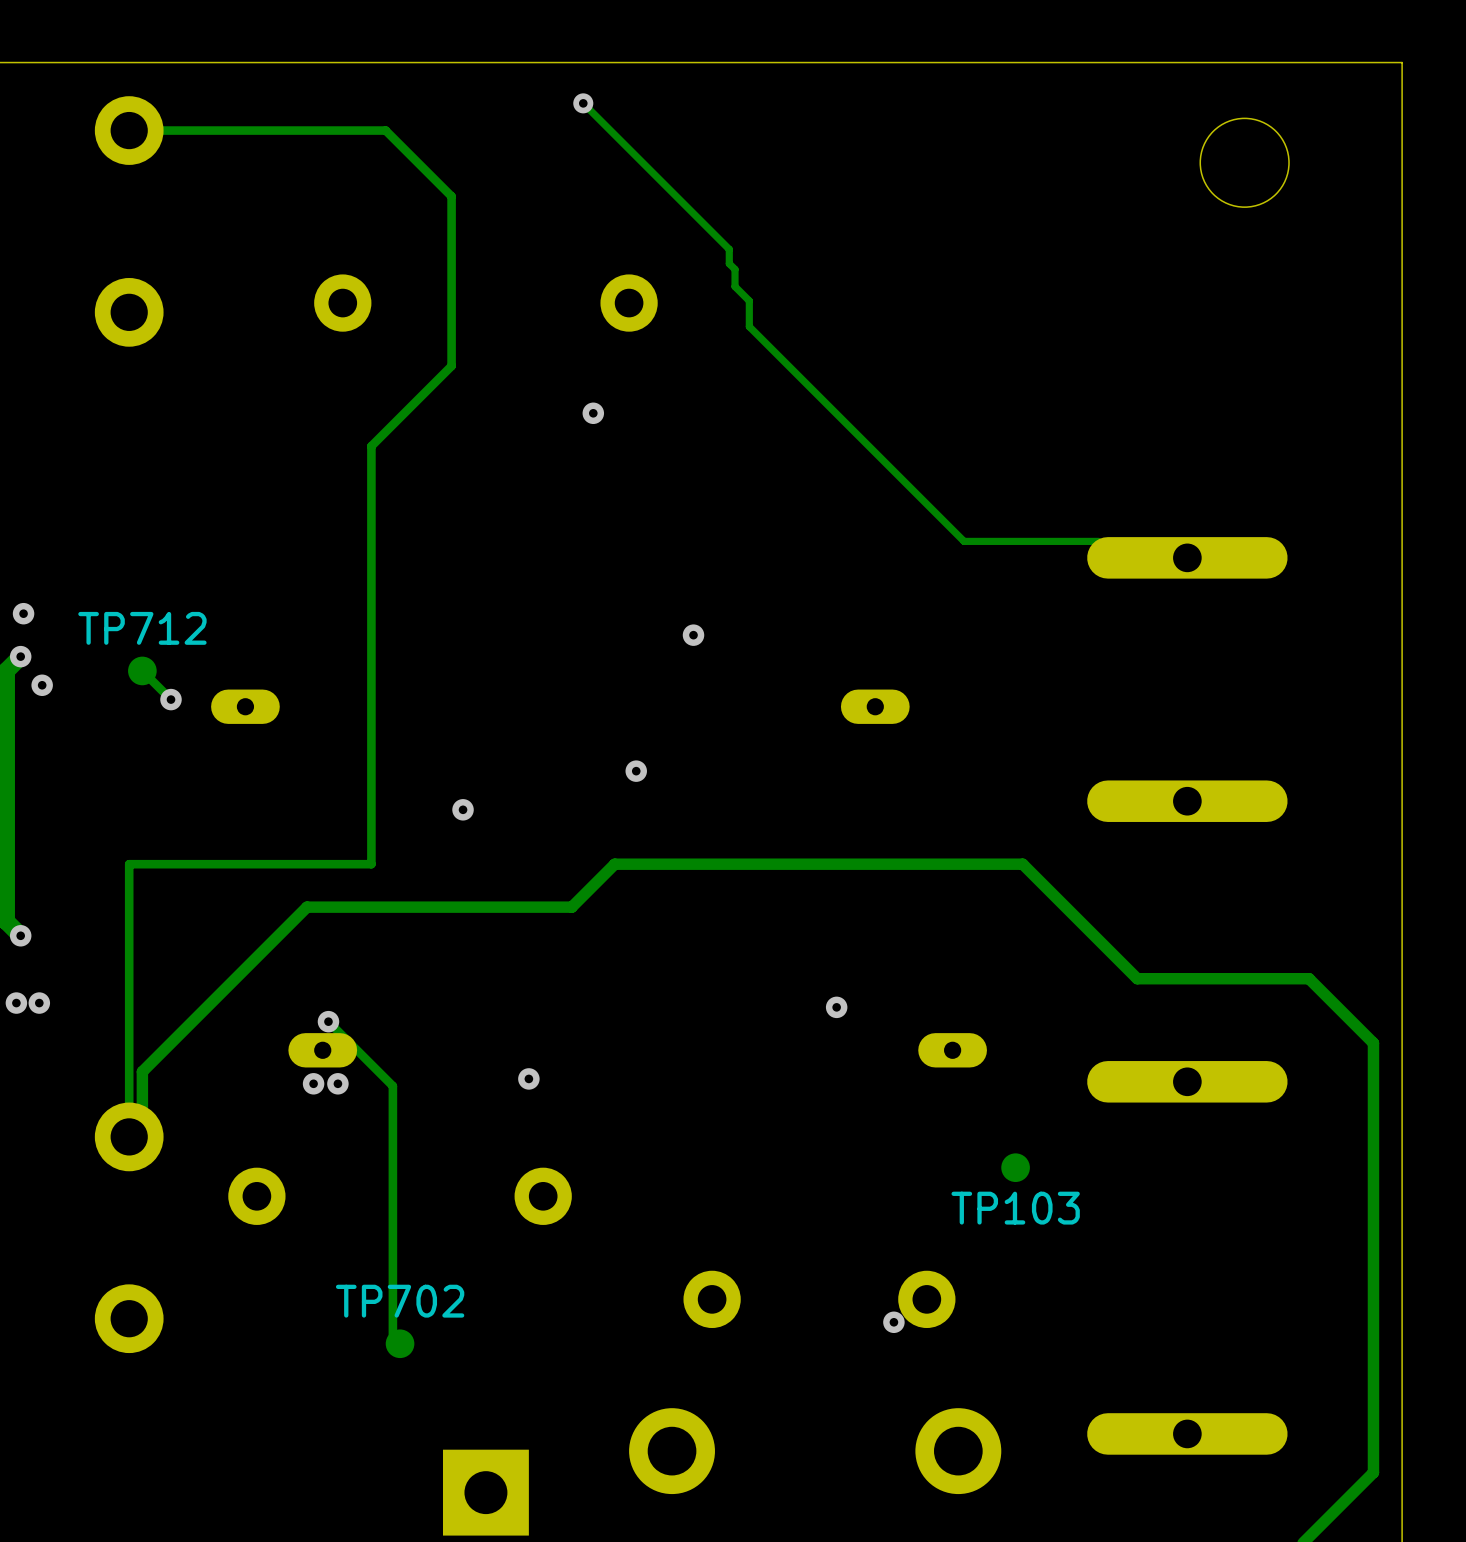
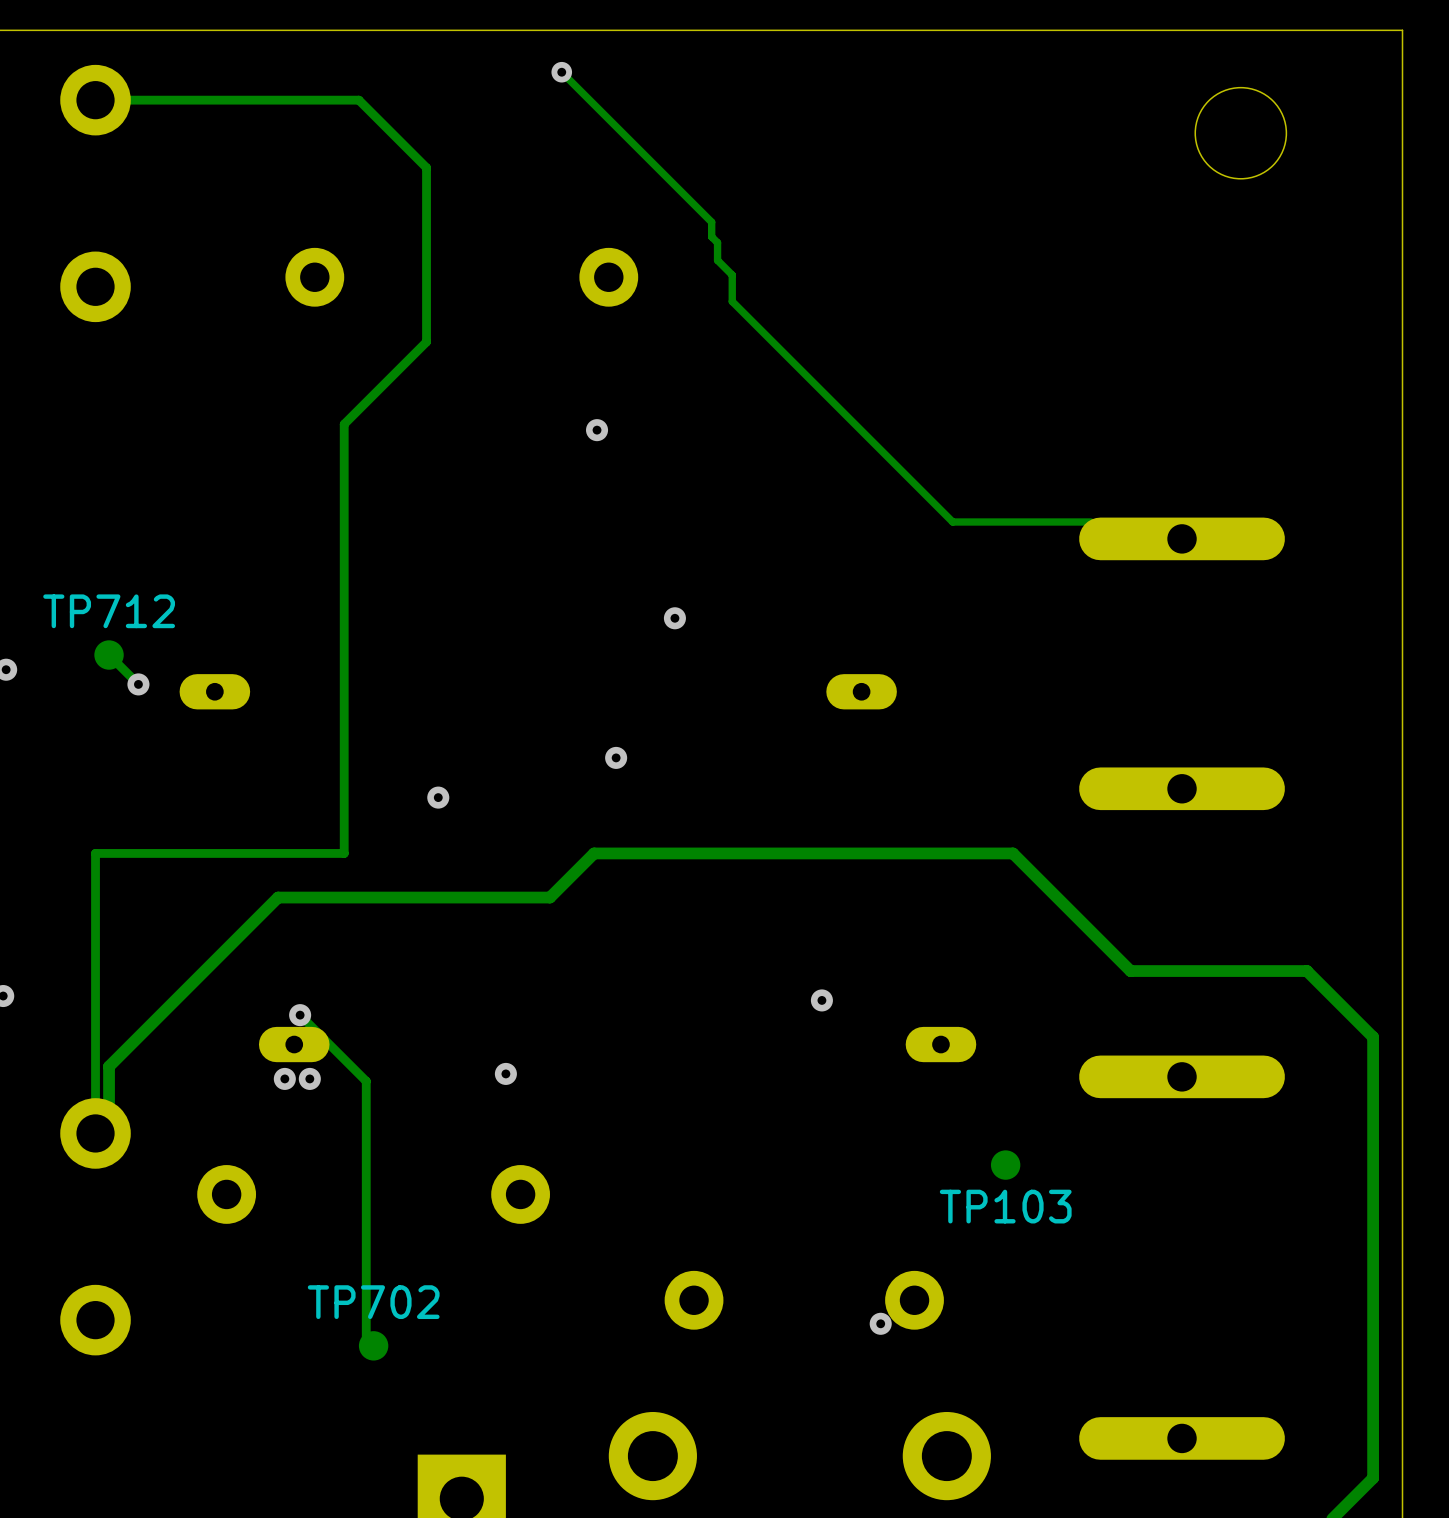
via position: (593, 413) -> (597, 430)

